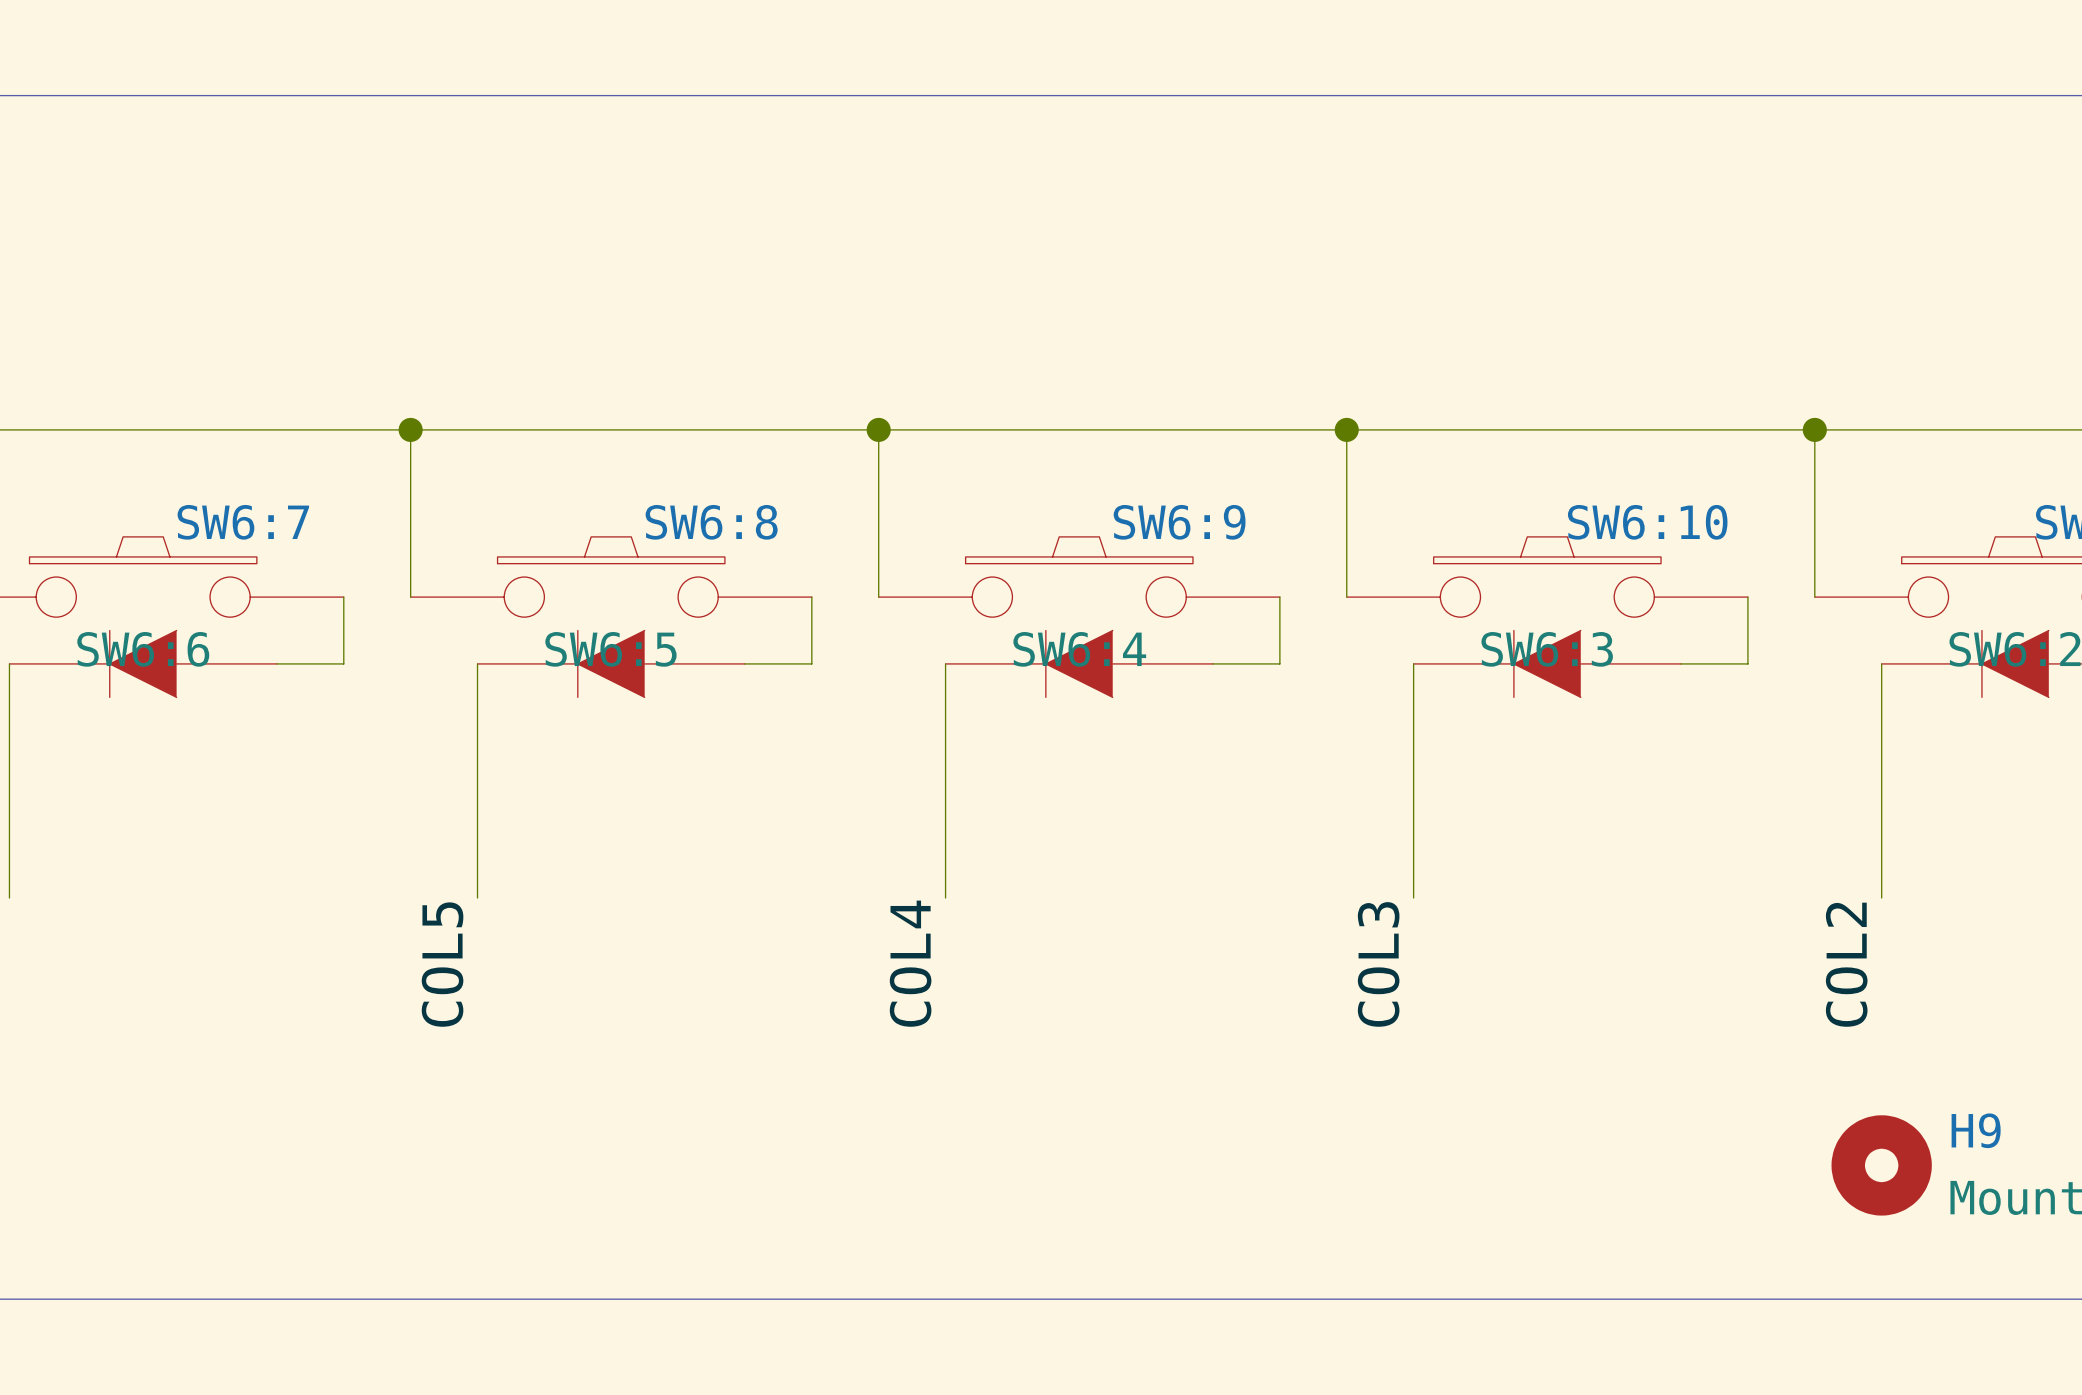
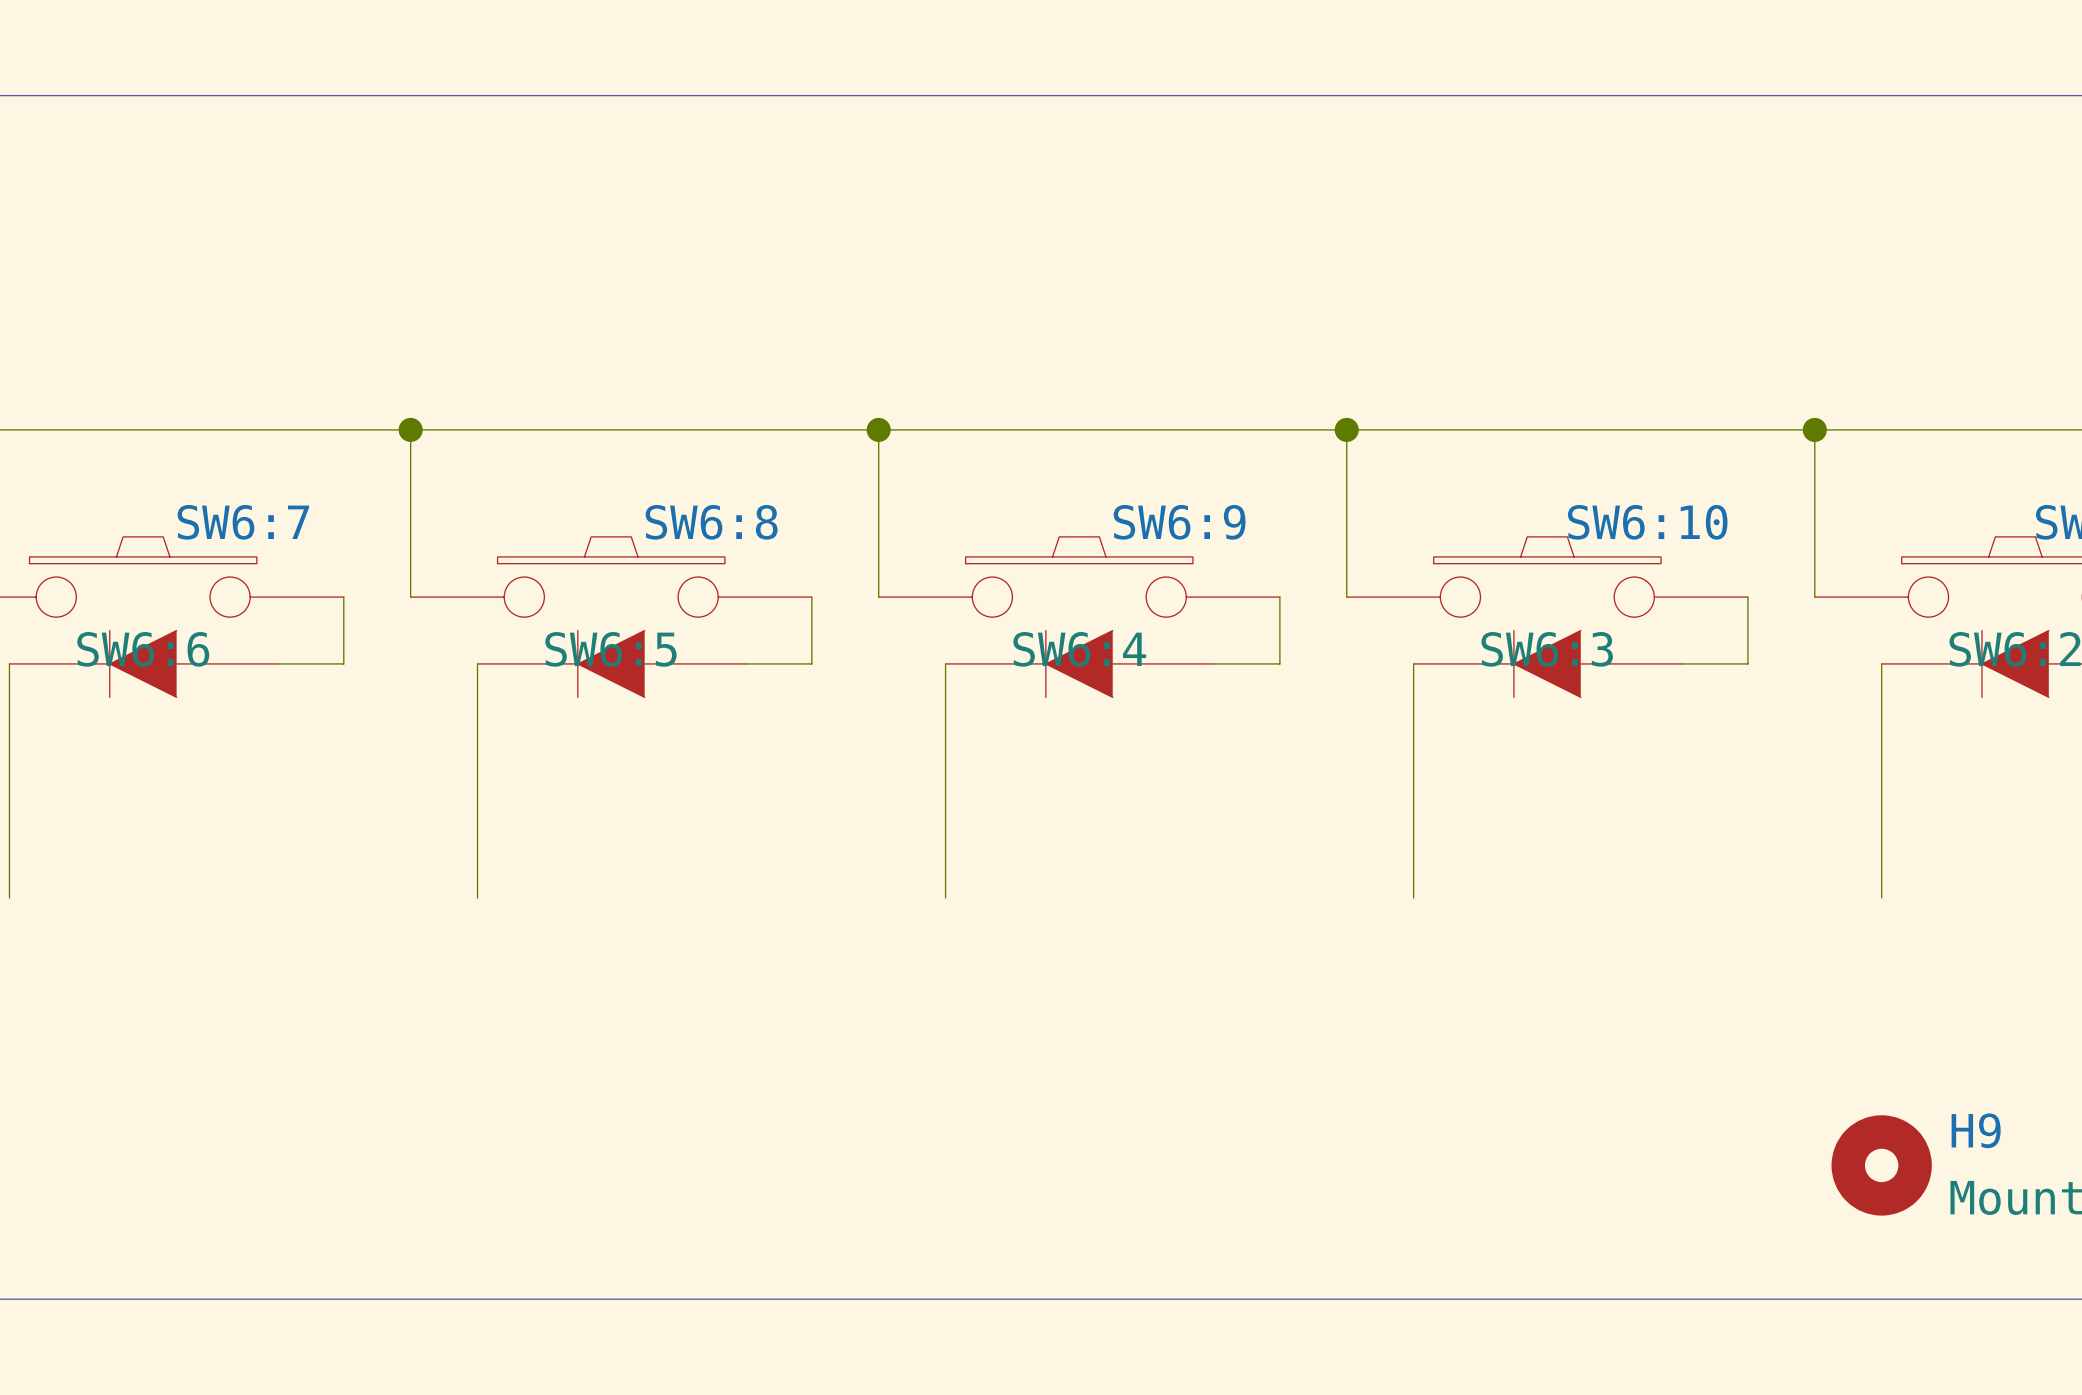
label: COL4 (910, 963) -> none
label: COL5 (442, 964) -> none
label: COL3 (1378, 964) -> none
label: COL2 (1846, 964) -> none

